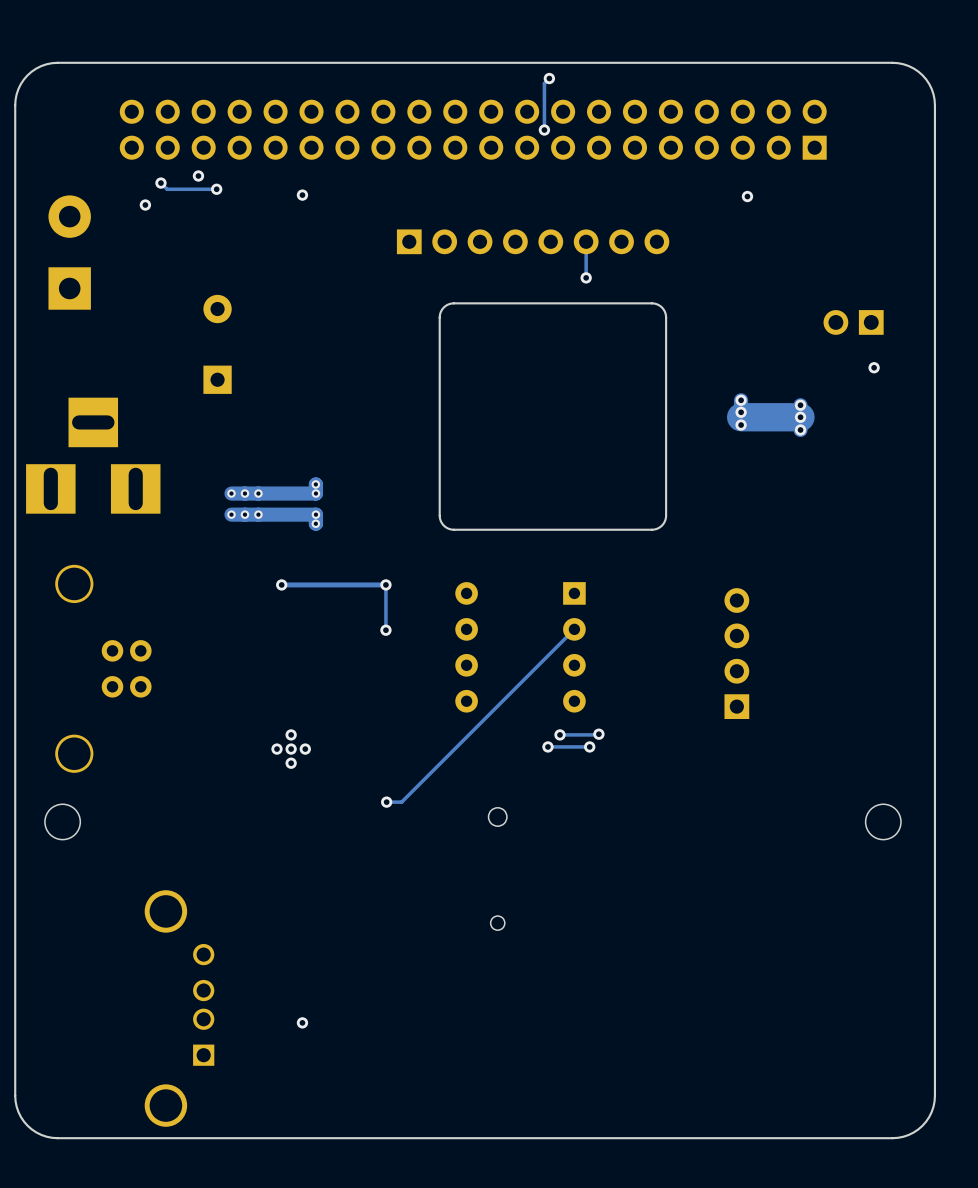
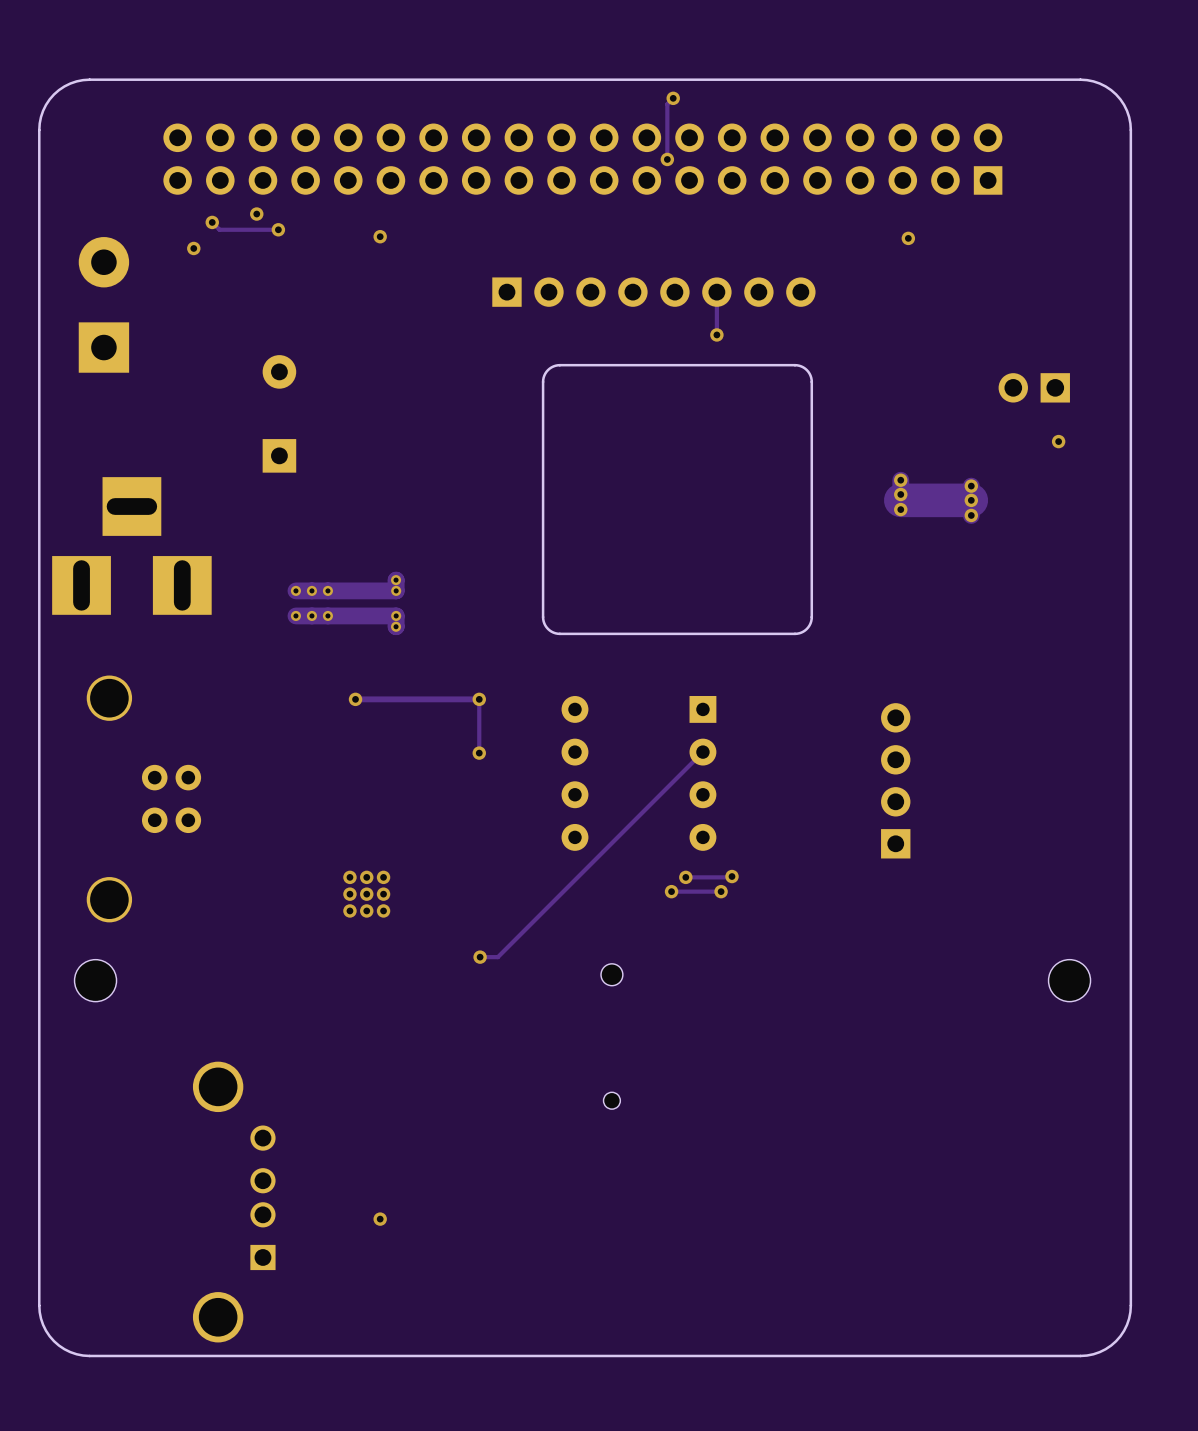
via: none -> (349, 877)
via: none -> (383, 877)
via: none -> (349, 910)
via: none -> (383, 910)

